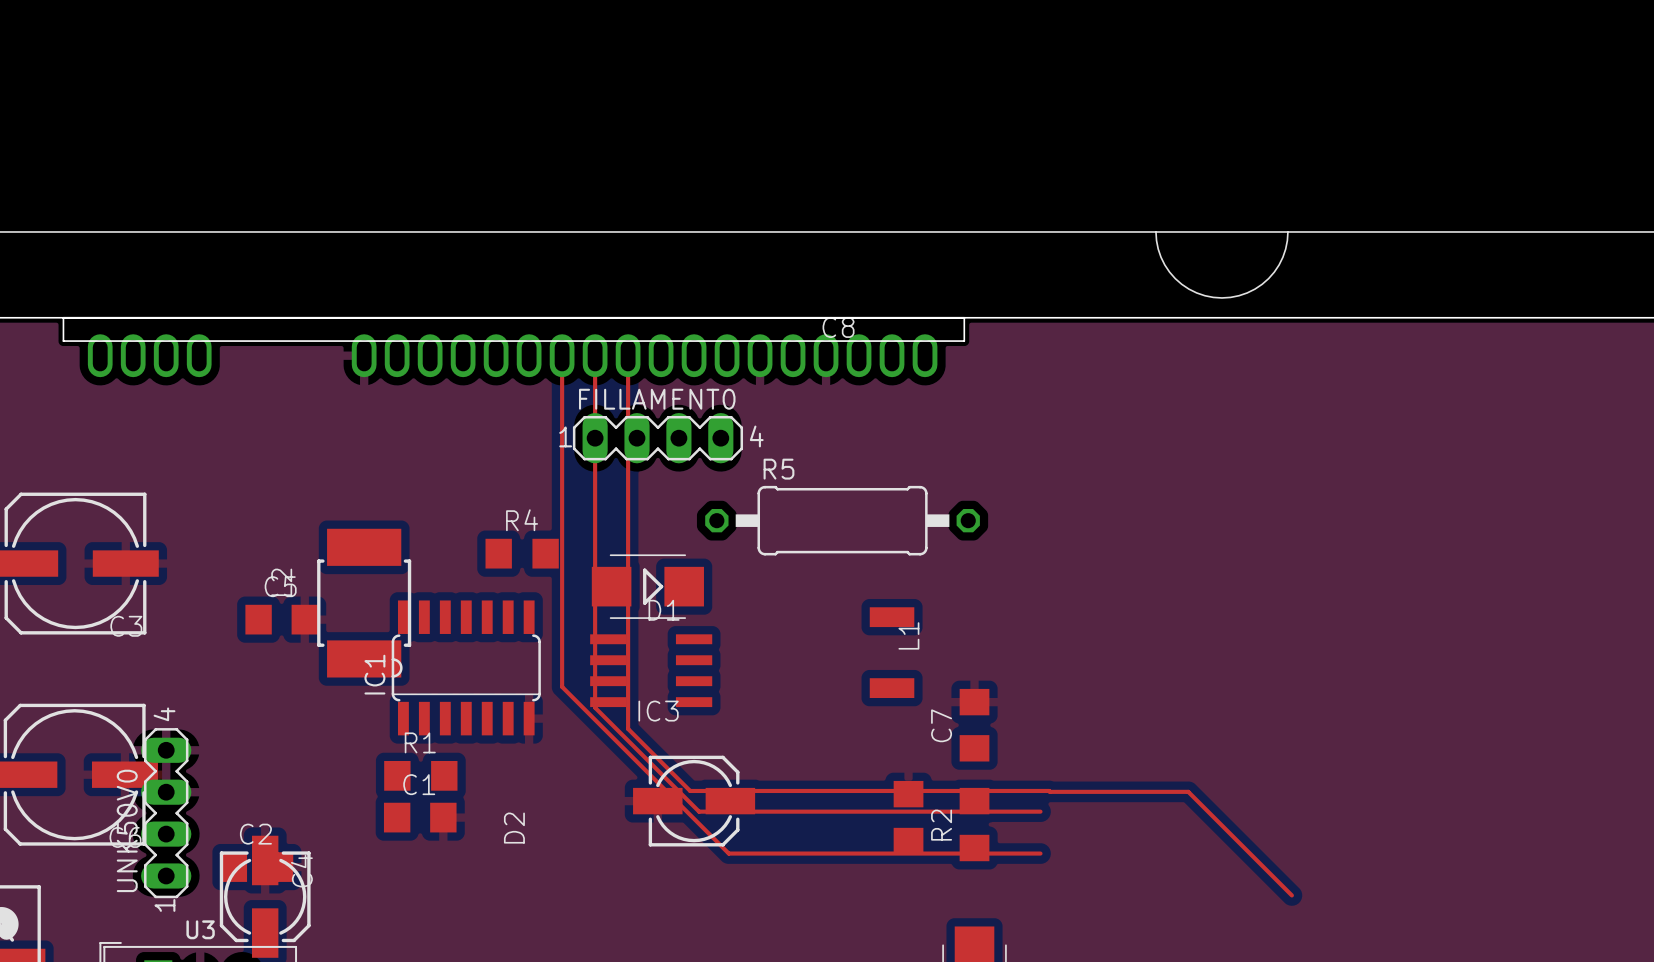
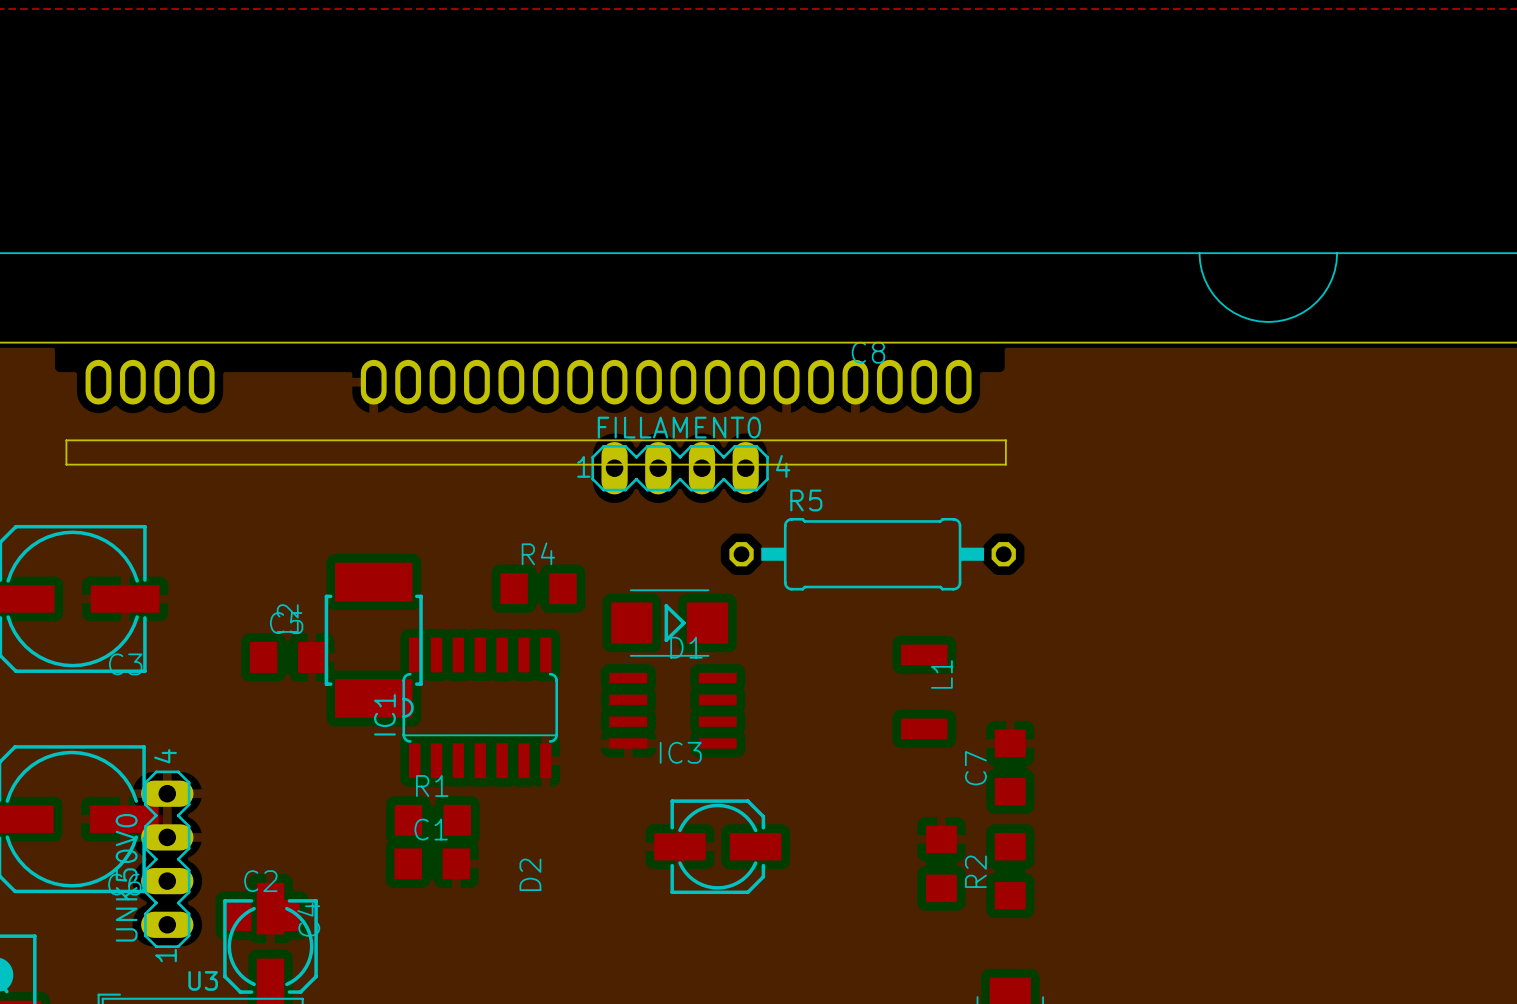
board edge: (63, 317) (63, 341) (964, 341) (964, 317) -> none
top track: (562, 350) (562, 686) (728, 853) (1040, 853) -> none
top track: (595, 350) (595, 707) (699, 811) (1040, 811) -> none
top track: (628, 350) (628, 728) (690, 790) (1188, 791) (1291, 895) -> none
board edge: none -> (66, 440) (1005, 440) (1005, 464) (66, 464) (66, 440)

